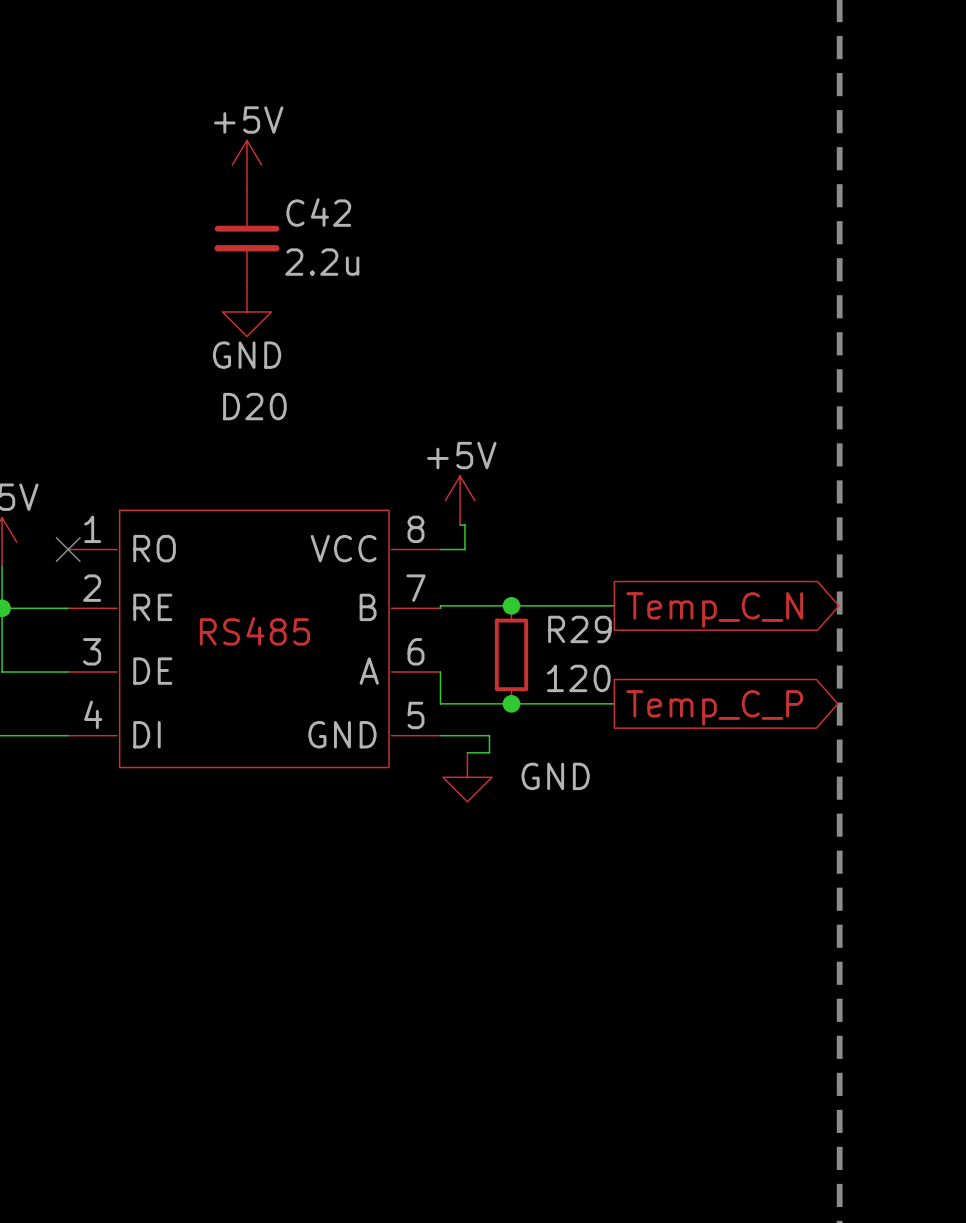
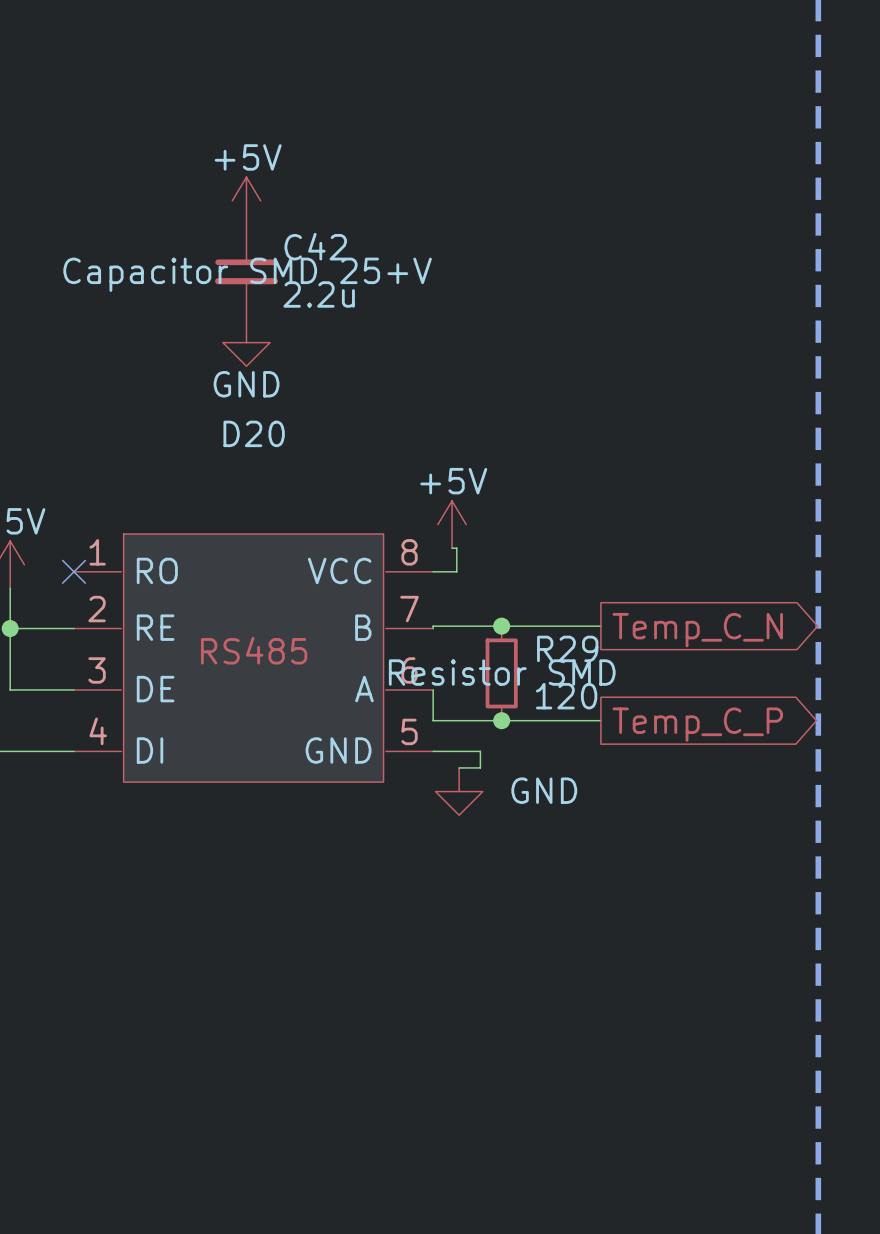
C42 text: none -> Capacitor SMD 25+V (247, 274)
R29 text: none -> Resistor SMD (502, 672)

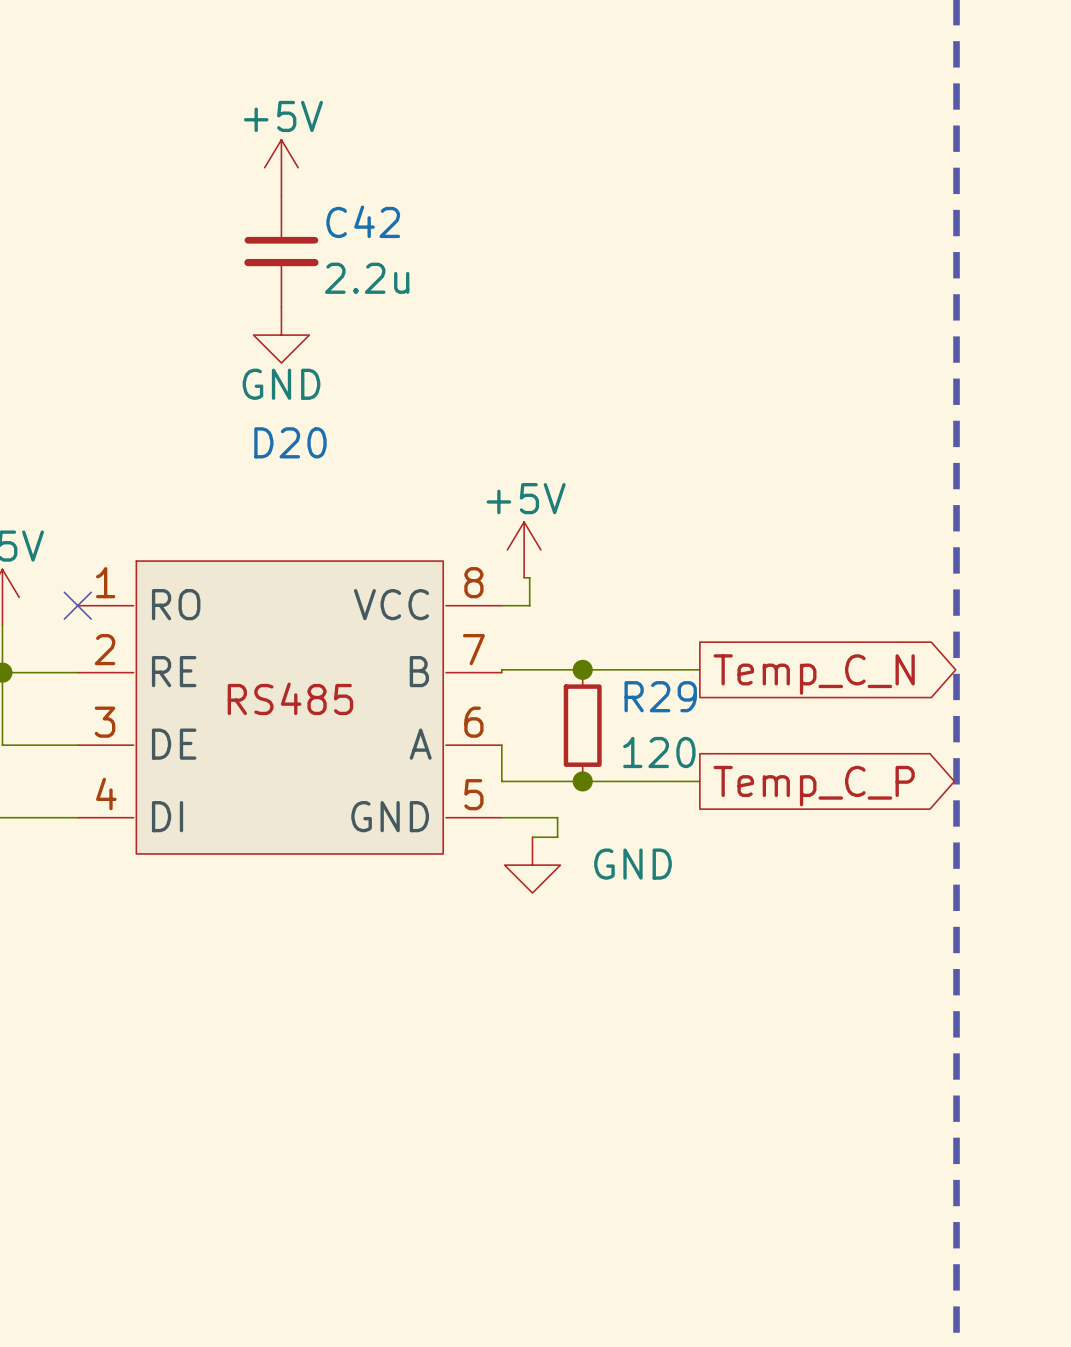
C42 text: Capacitor SMD 25+V (247, 274) -> none
R29 text: Resistor SMD (502, 672) -> none

